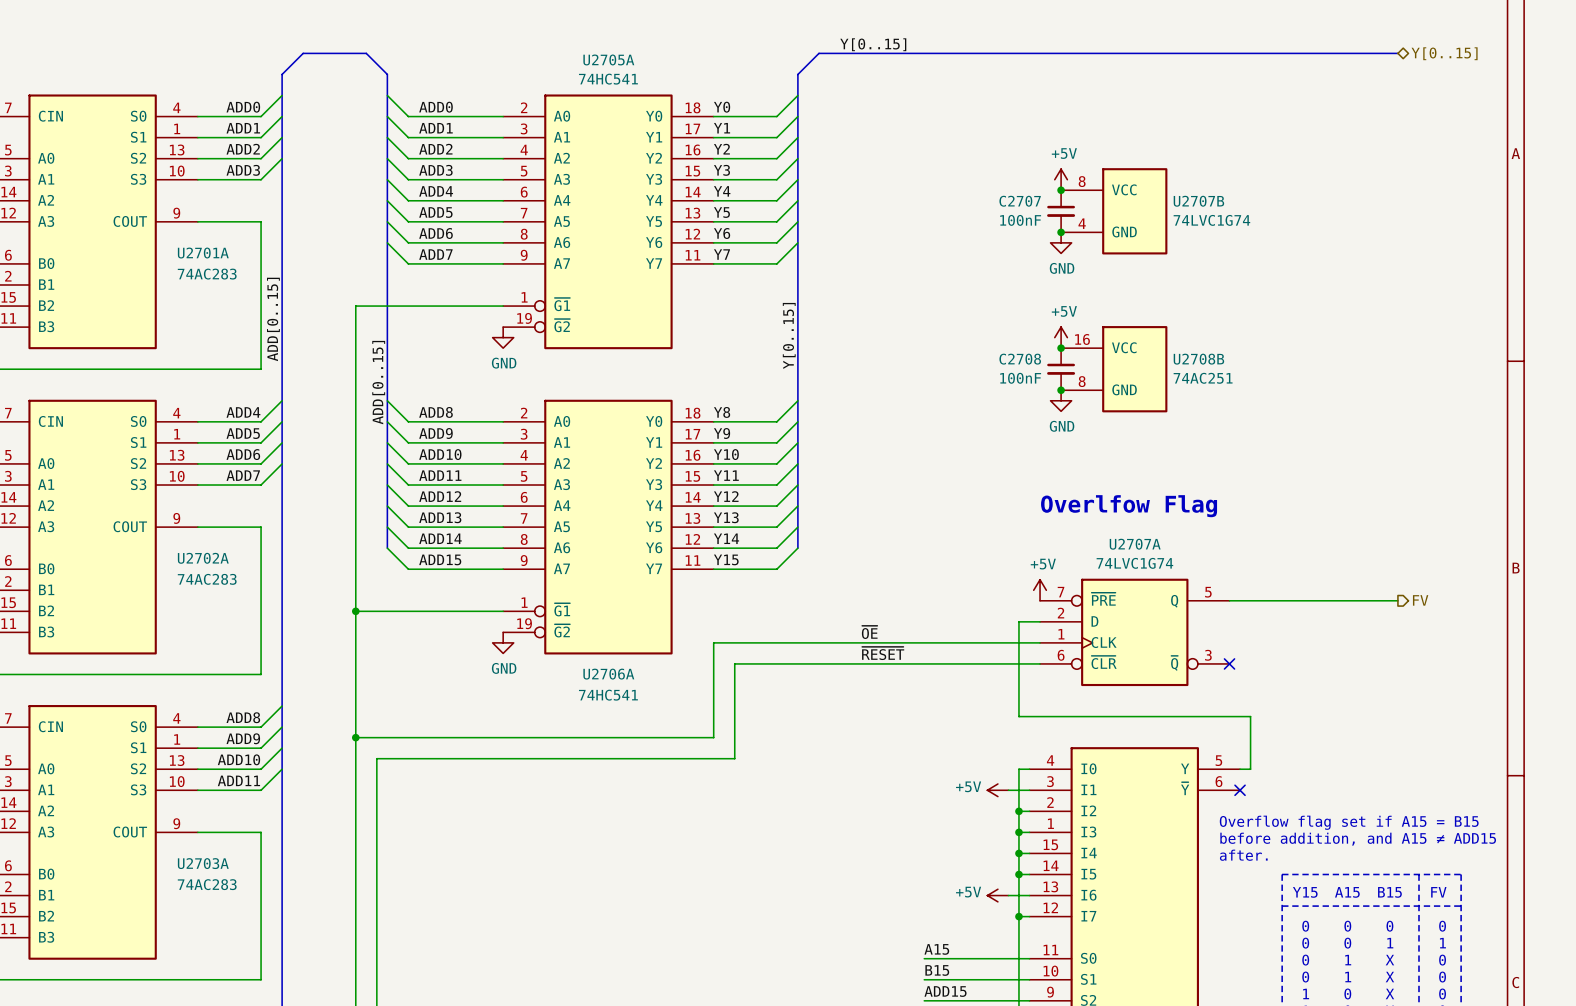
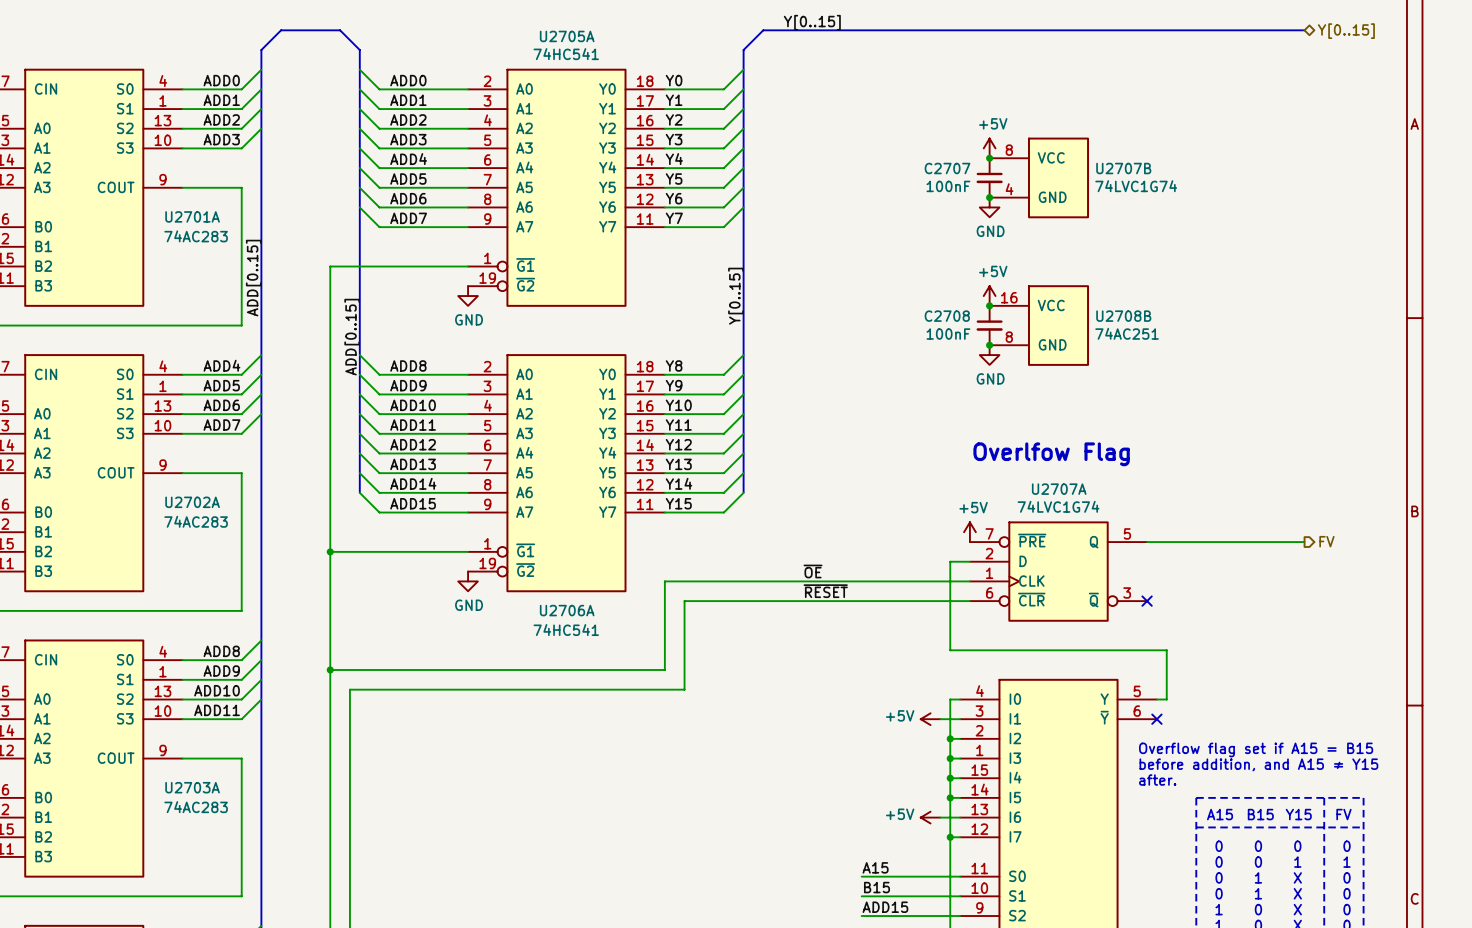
text: before addition, and A15 ≠ ADD15 (1358, 839) -> before addition, and A15 ≠ Y15 (1258, 764)
text: Y15 (1305, 892) -> A15 (1220, 814)
text: A15 (1347, 892) -> B15 (1260, 814)
text: B15 (1389, 892) -> Y15 (1298, 814)

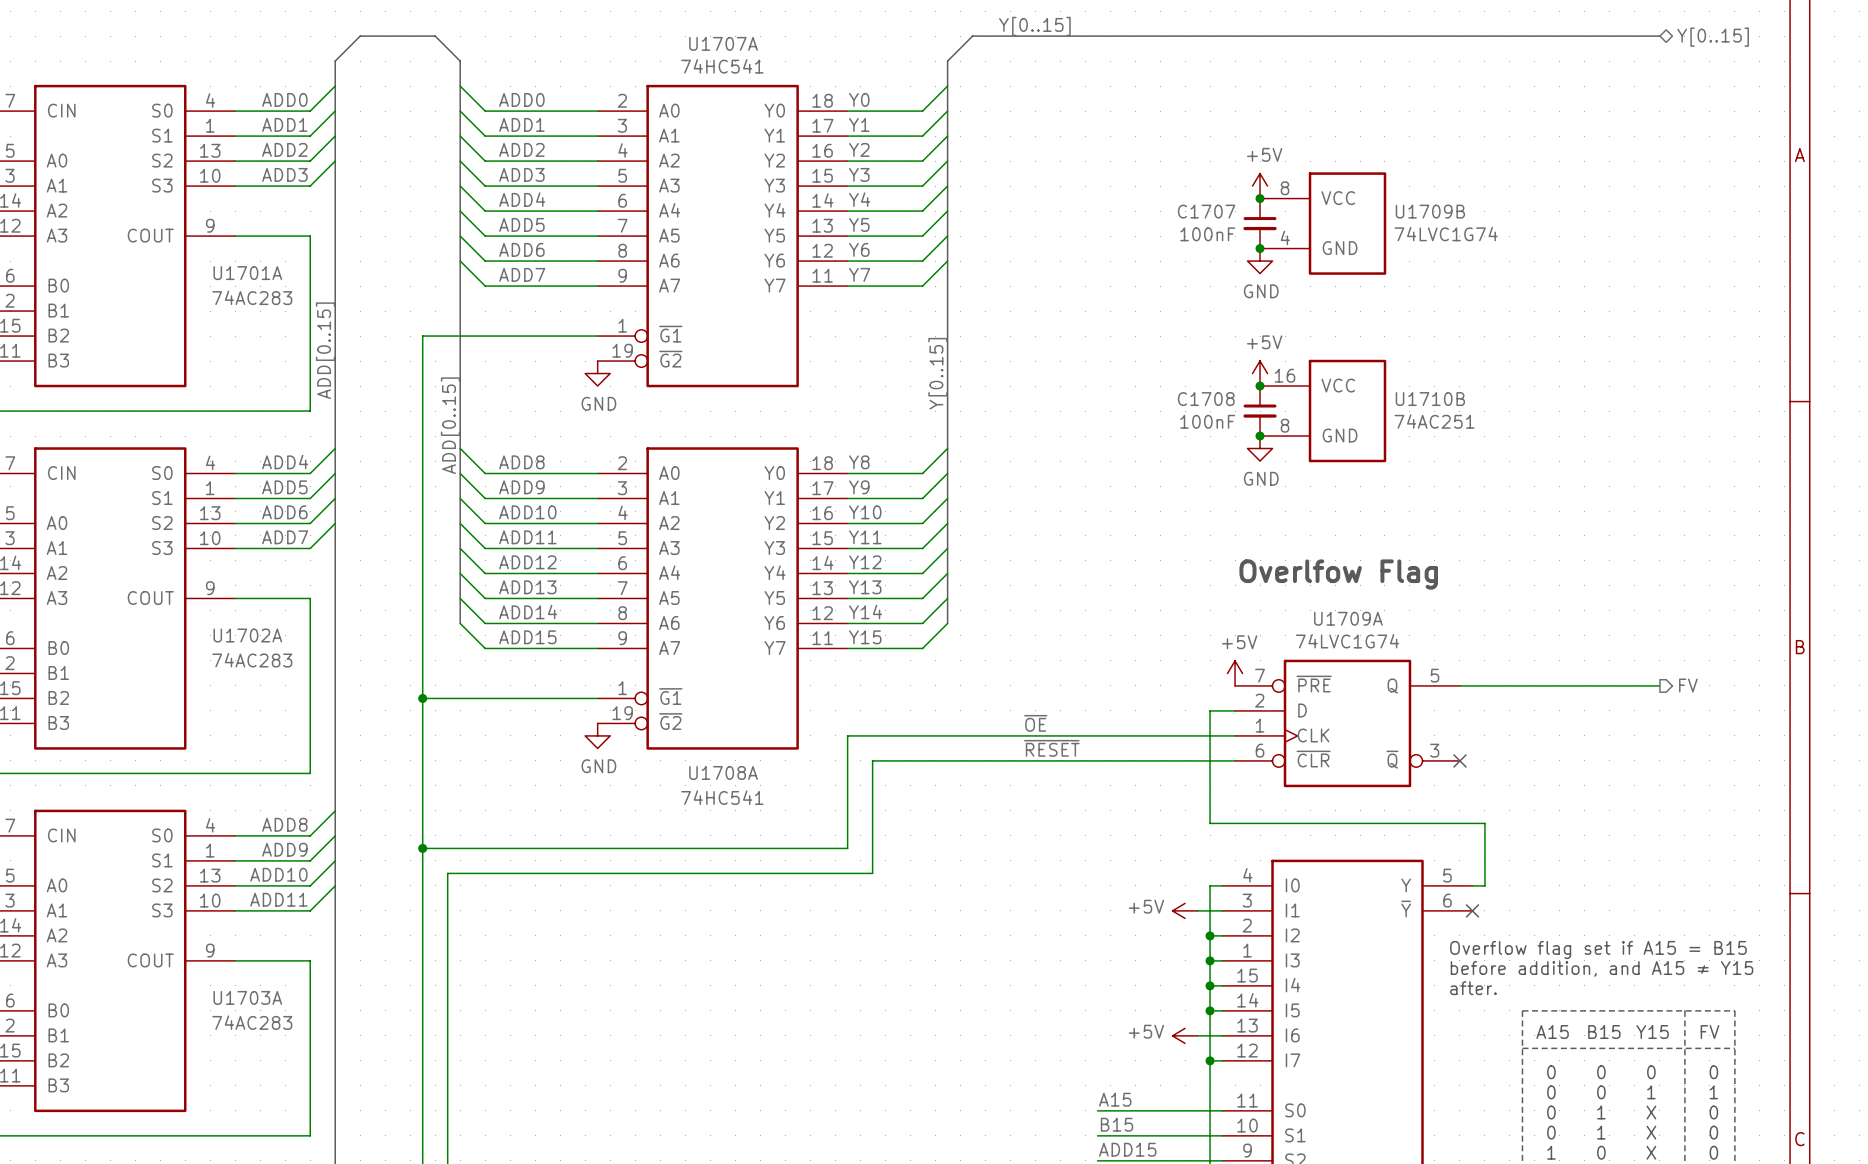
U2705A name: U2705A (567, 36) -> U1707A (723, 43)
C2707 name: C2707 (947, 168) -> C1707 (1206, 211)
U2707B name: U2707B (1123, 168) -> U1709B (1430, 211)
U2701A name: U2701A (192, 216) -> U1701A (247, 273)
C2708 name: C2708 (947, 316) -> C1708 (1206, 399)
U2708B name: U2708B (1123, 316) -> U1710B (1430, 399)
U2707A name: U2707A (1059, 489) -> U1709A (1348, 618)
U2702A name: U2702A (192, 502) -> U1702A (247, 635)
U2706A name: U2706A (567, 610) -> U1708A (723, 772)
U2703A name: U2703A (192, 787) -> U1703A (247, 997)

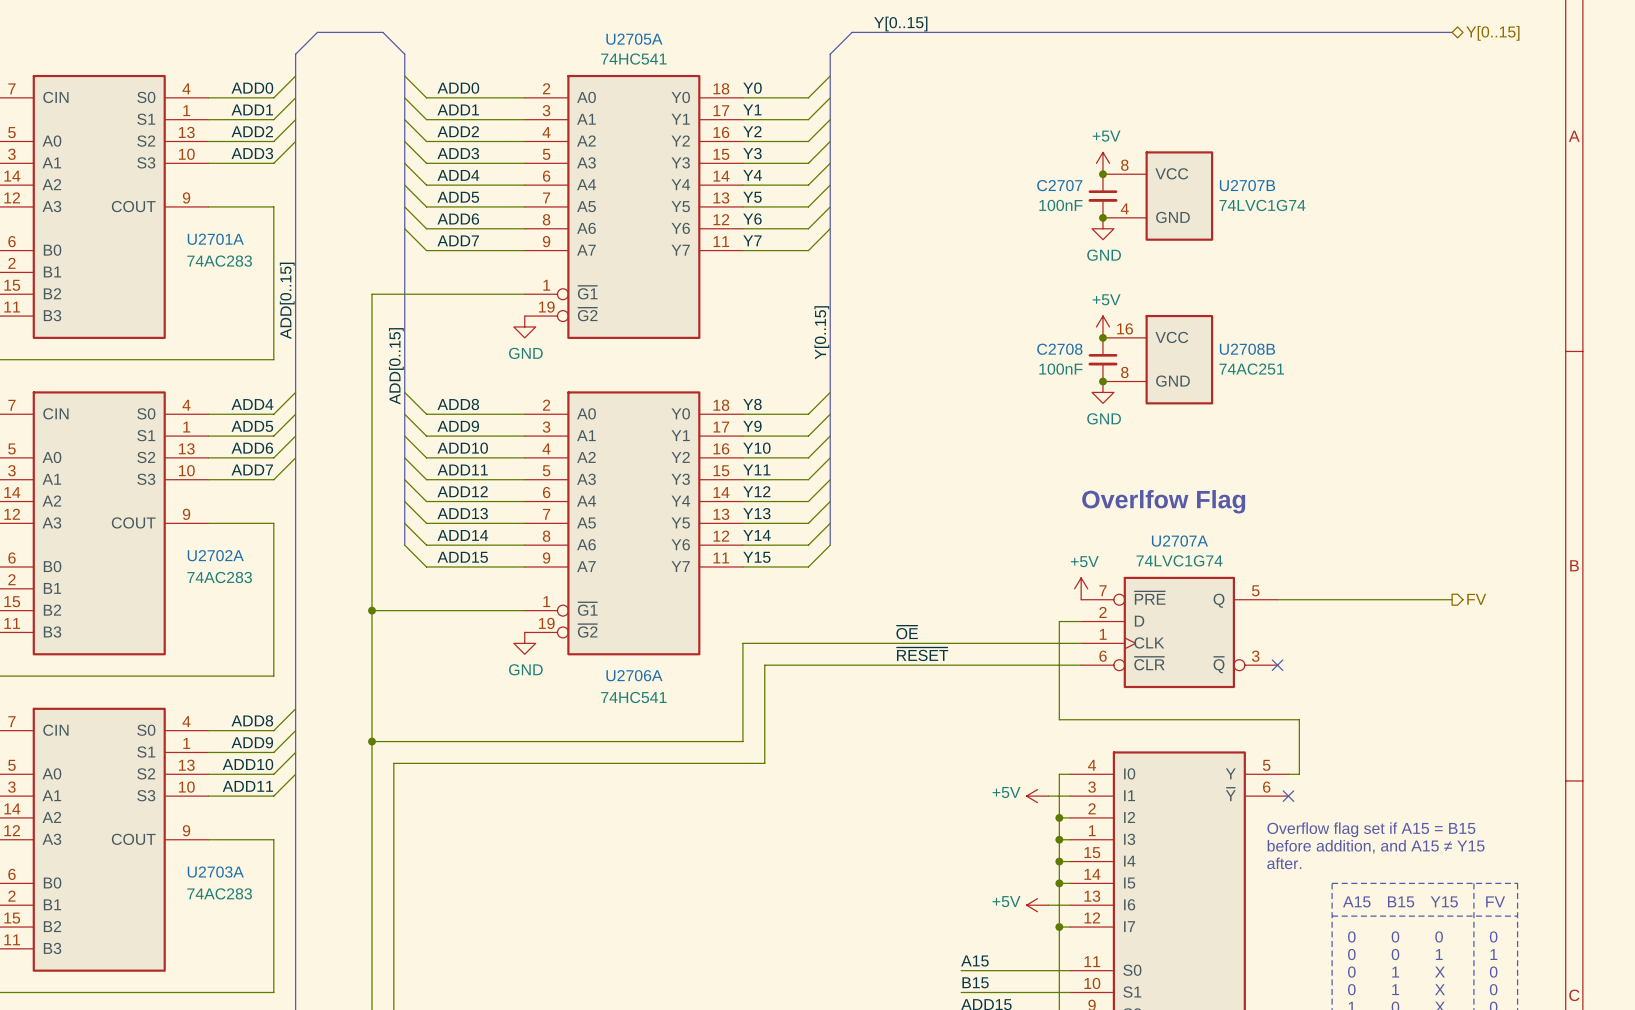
U1707A name: U1707A (723, 43) -> U2705A (634, 39)
C1707 name: C1707 (1206, 211) -> C2707 (1059, 185)
U1709B name: U1709B (1430, 211) -> U2707B (1247, 185)
U1701A name: U1701A (247, 273) -> U2701A (215, 239)
C1708 name: C1708 (1206, 399) -> C2708 (1059, 349)
U1710B name: U1710B (1430, 399) -> U2708B (1247, 349)
U1709A name: U1709A (1348, 618) -> U2707A (1179, 541)
U1702A name: U1702A (247, 635) -> U2702A (215, 555)
U1708A name: U1708A (723, 772) -> U2706A (634, 675)
U1703A name: U1703A (247, 997) -> U2703A (215, 872)

